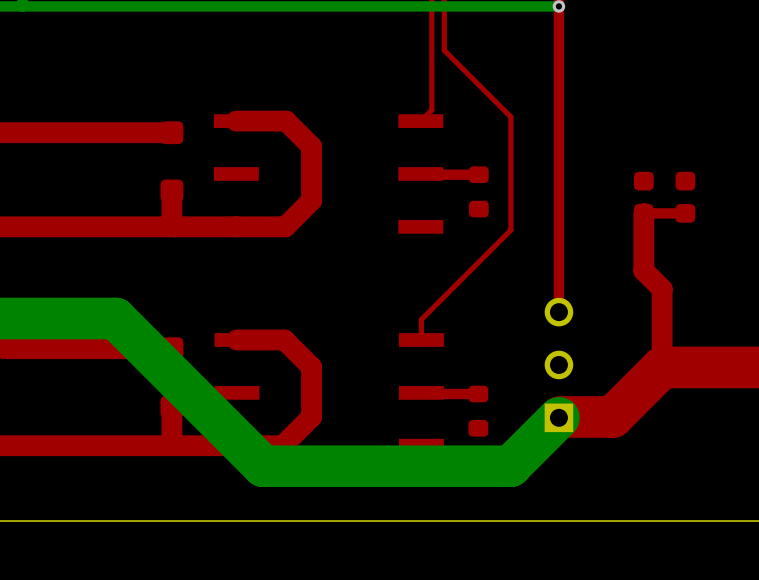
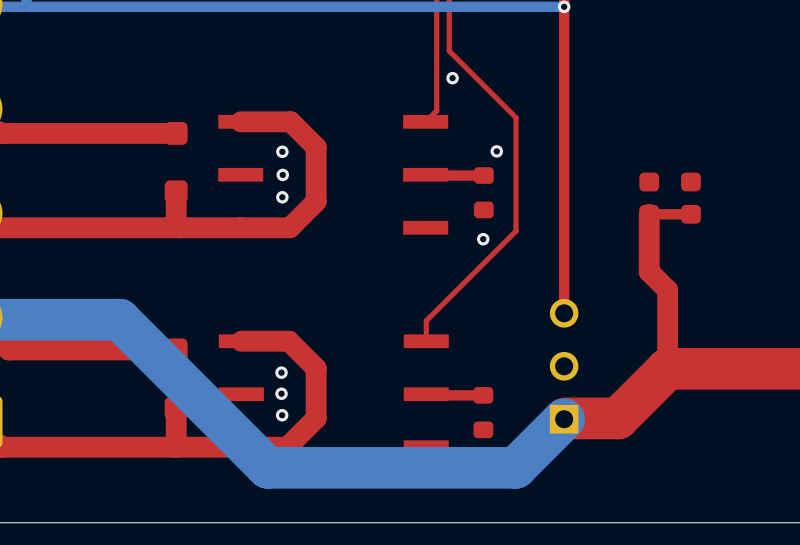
via: none -> (452, 78)
via: none -> (496, 151)
via: none -> (282, 151)
via: none -> (282, 174)
via: none -> (282, 197)
via: none -> (483, 239)
via: none -> (281, 372)
via: none -> (281, 393)
via: none -> (282, 415)

